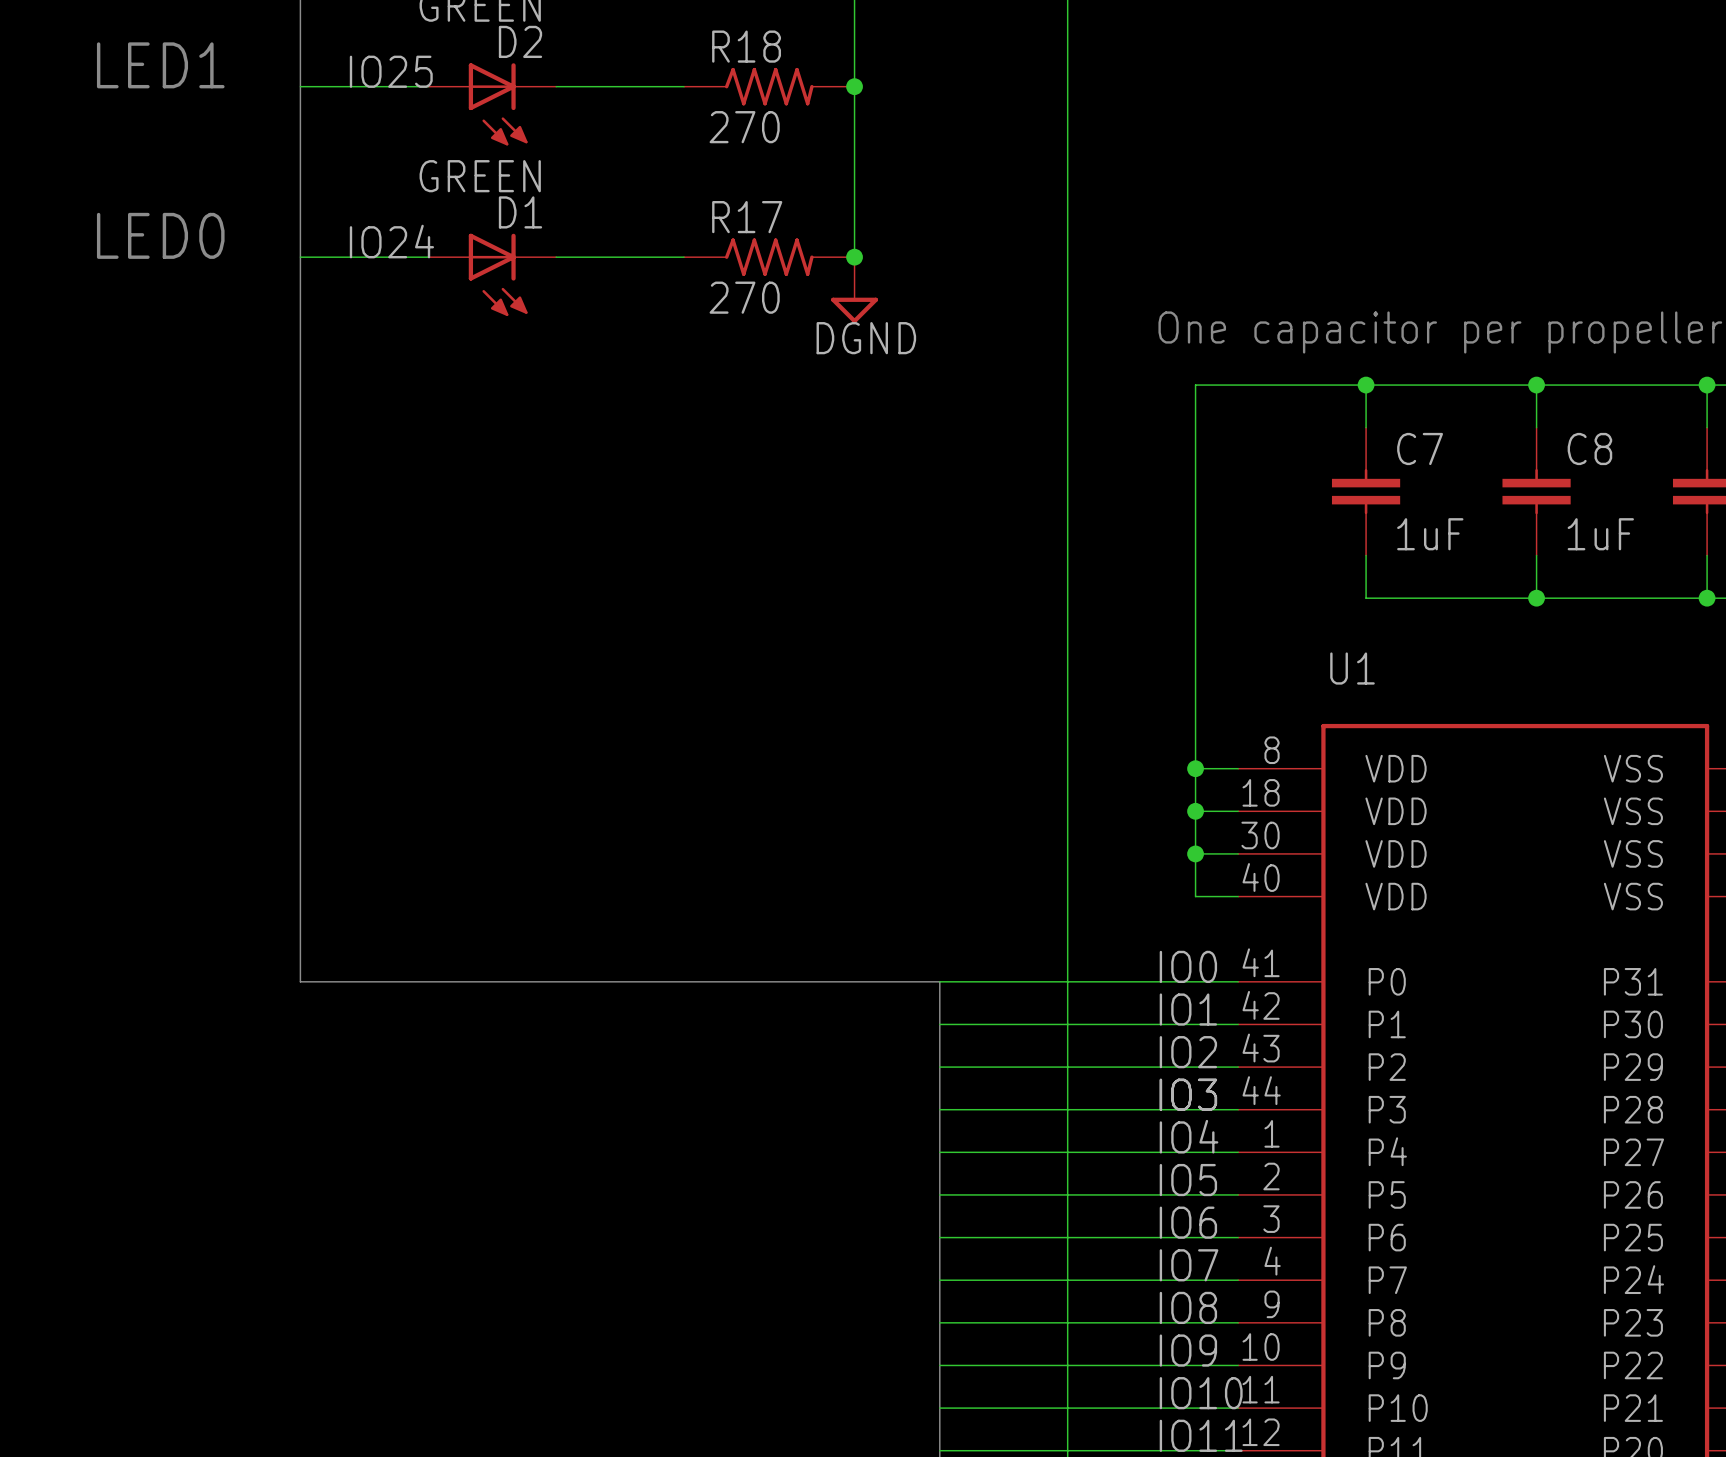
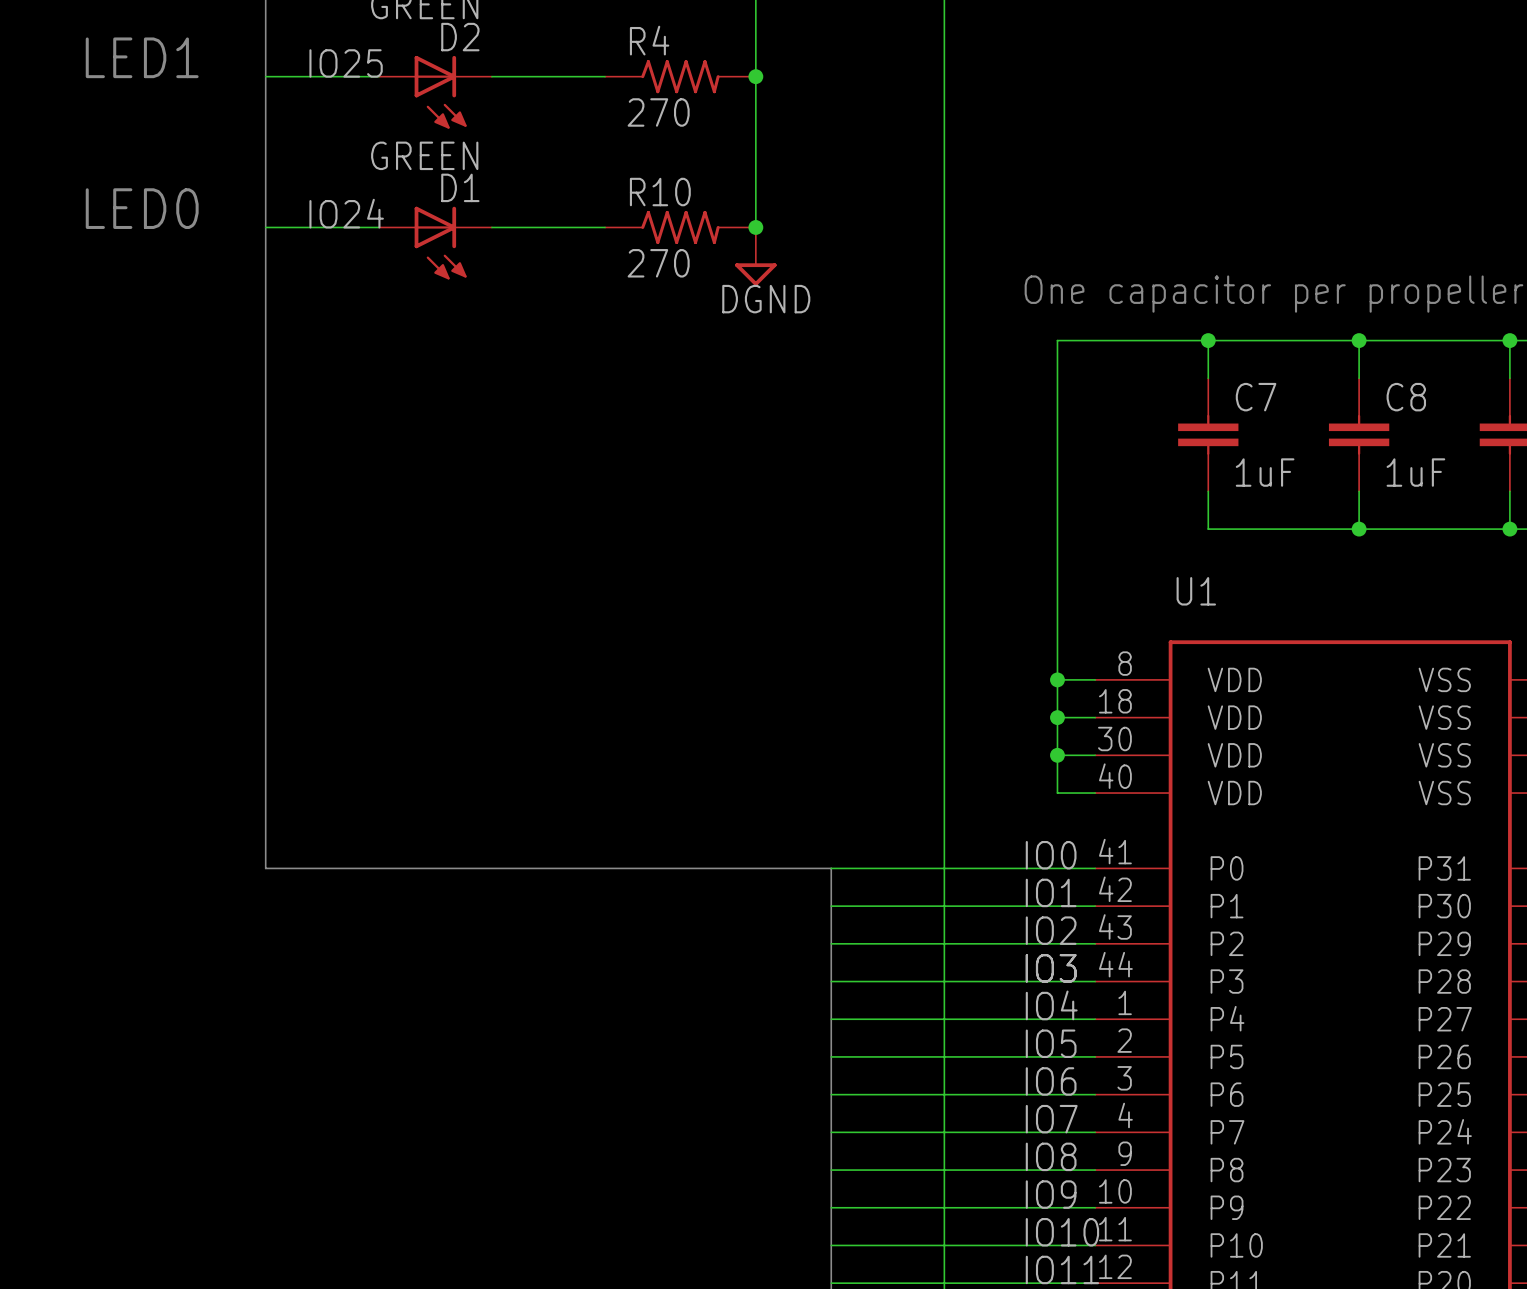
R18 name: R18 (746, 46) -> R4 (649, 40)
R17 name: R17 (747, 217) -> R10 (660, 192)

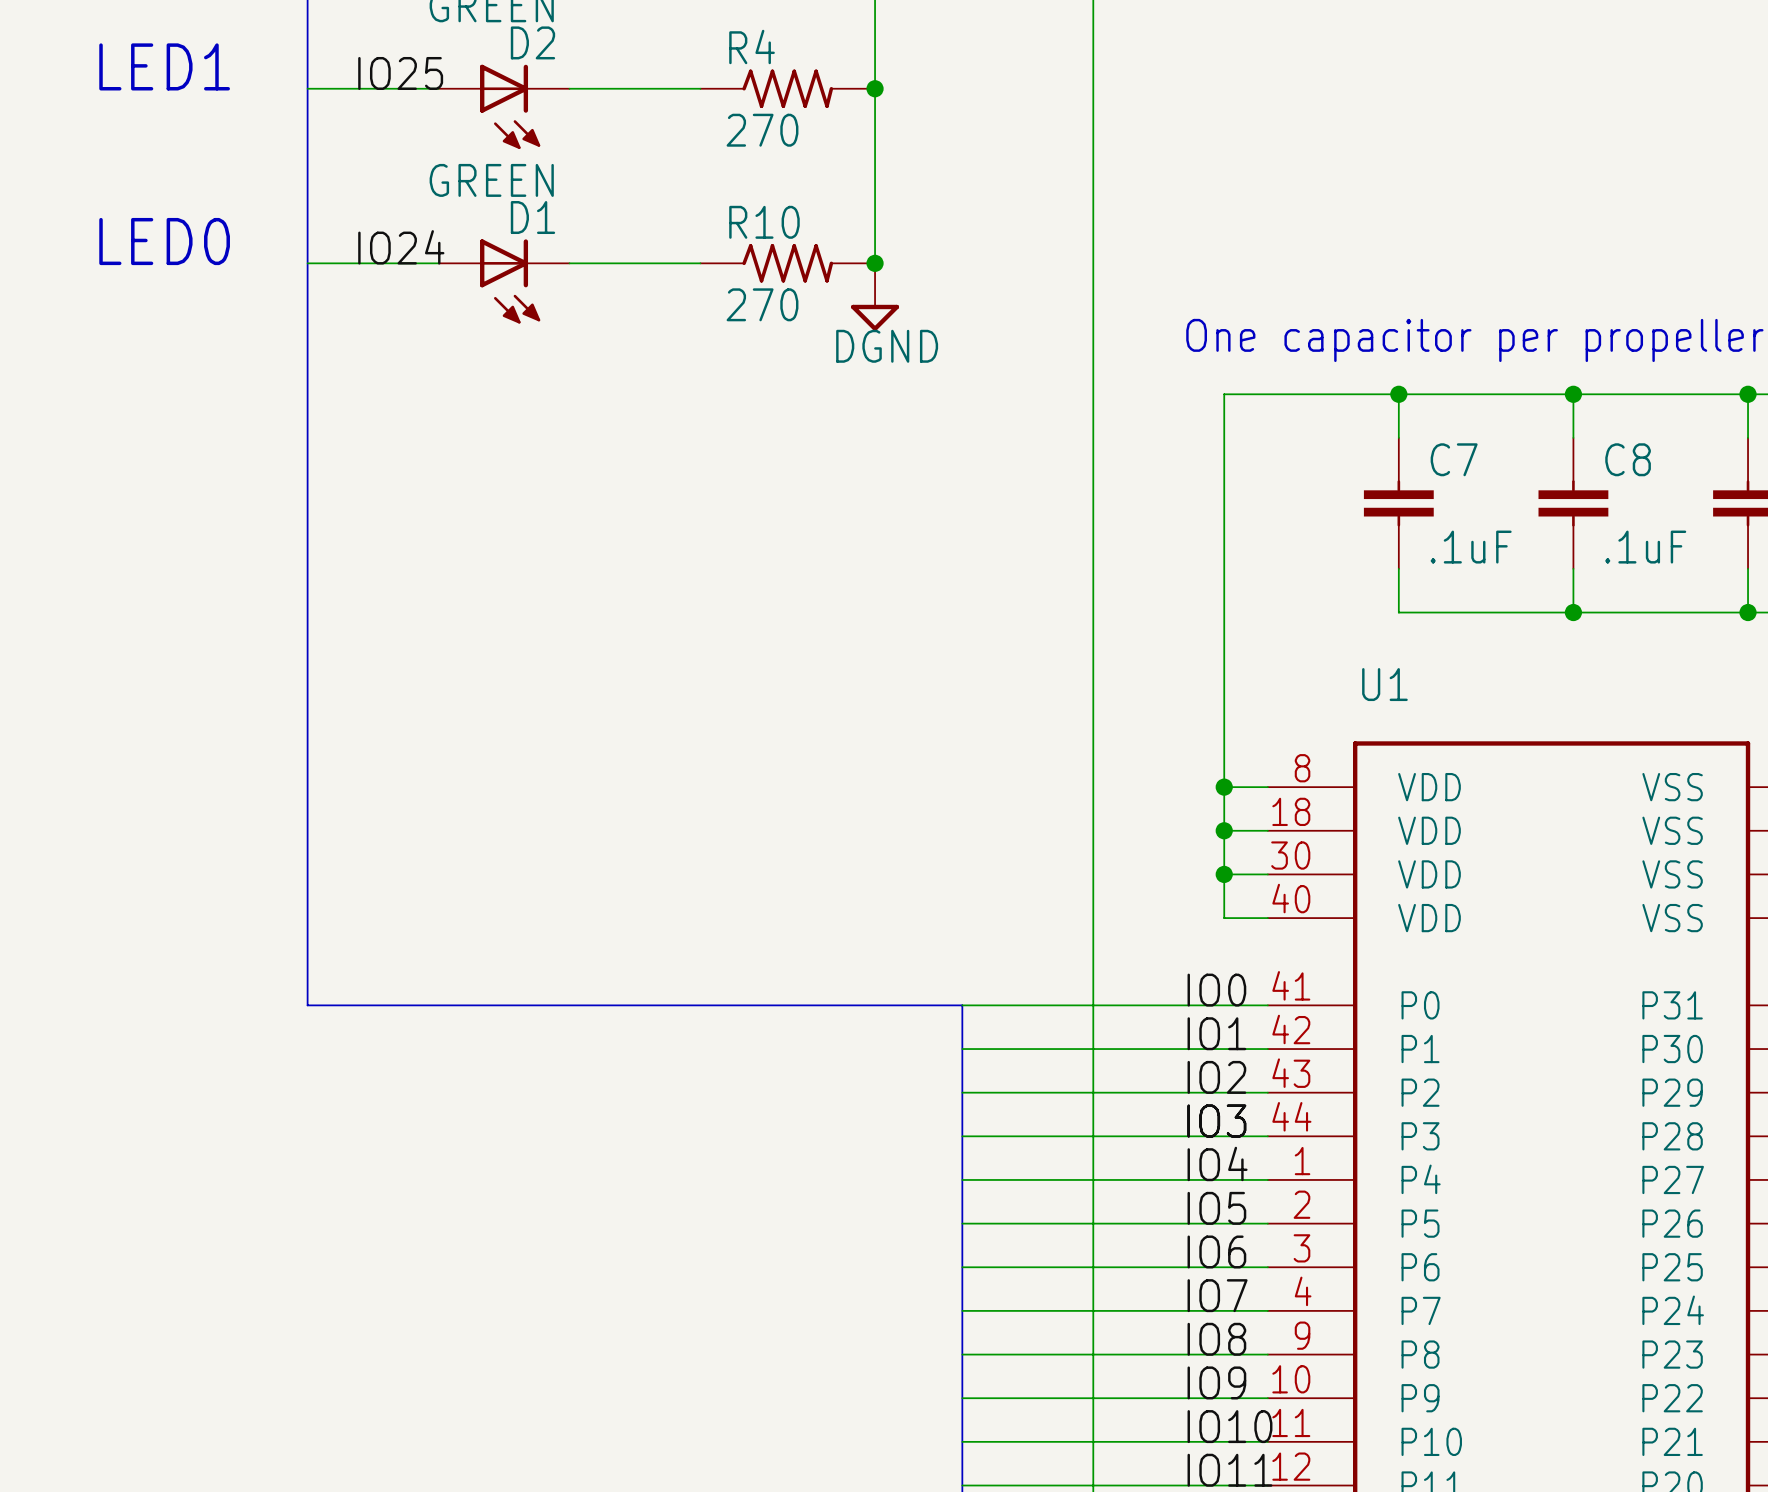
C7 value: 1uF (1265, 472) -> .1uF (1471, 547)
C8 value: 1uF (1415, 472) -> .1uF (1645, 547)

